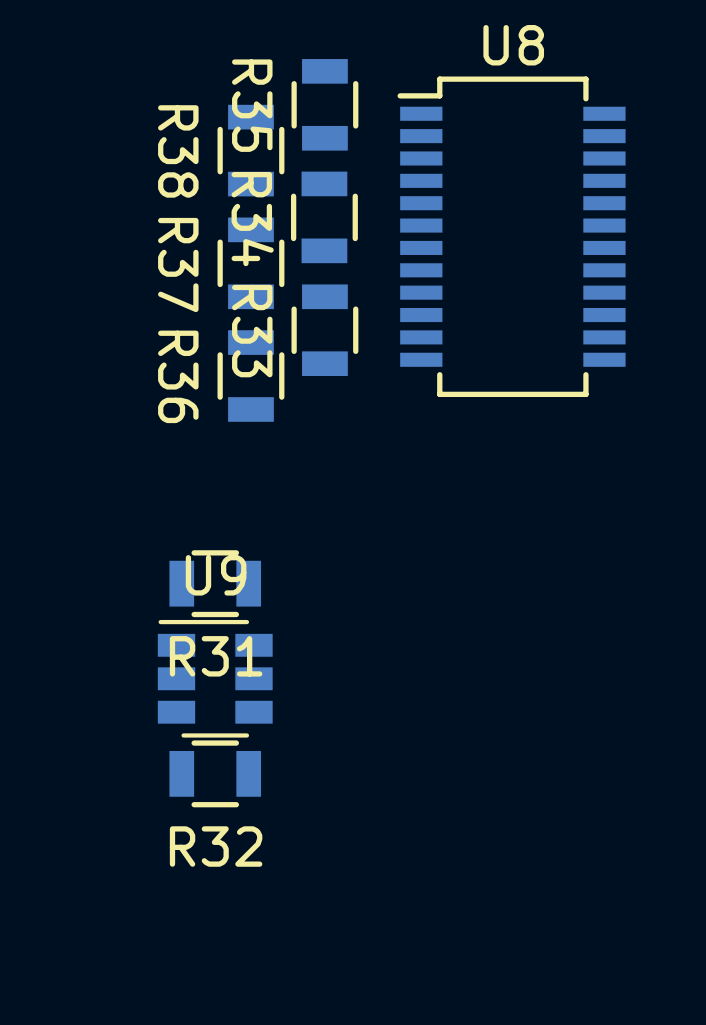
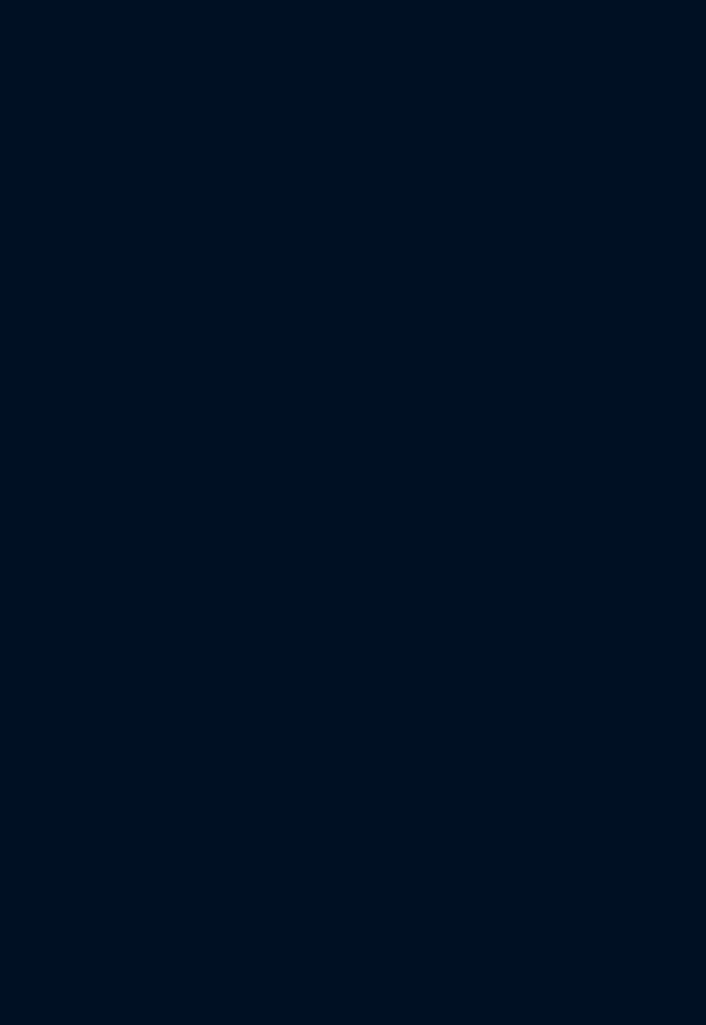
R35: (324, 104) -> none
R38: (250, 150) -> none
R34: (324, 217) -> none
U8: (511, 236) -> none
R37: (250, 263) -> none
R33: (324, 330) -> none
R36: (250, 376) -> none
R31: (215, 583) -> none
U9: (215, 678) -> none
R32: (215, 773) -> none

